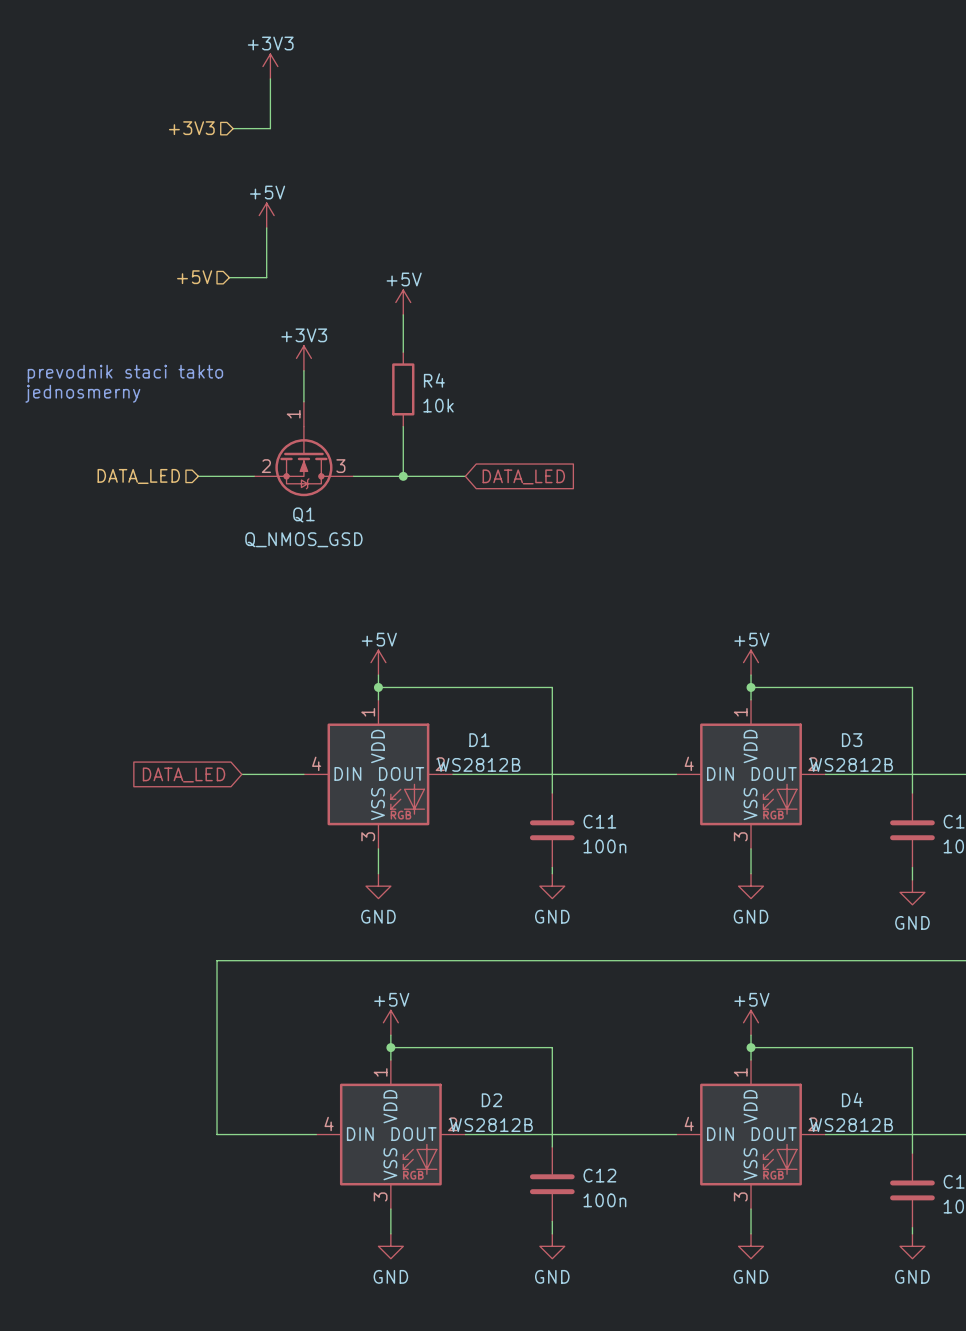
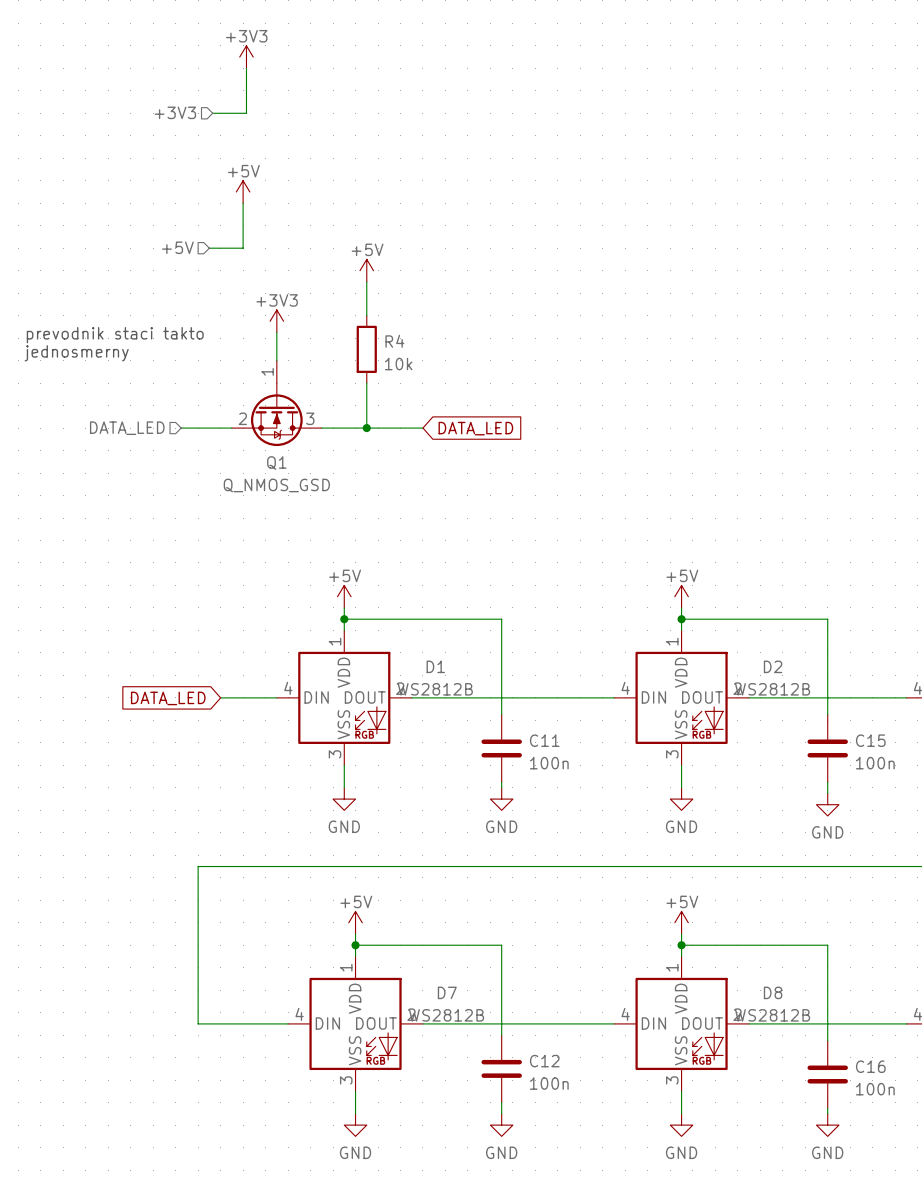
D3 name: D3 (852, 740) -> D2 (773, 666)
D4 name: D4 (852, 1099) -> D8 (773, 992)
D2 name: D2 (491, 1100) -> D7 (447, 992)

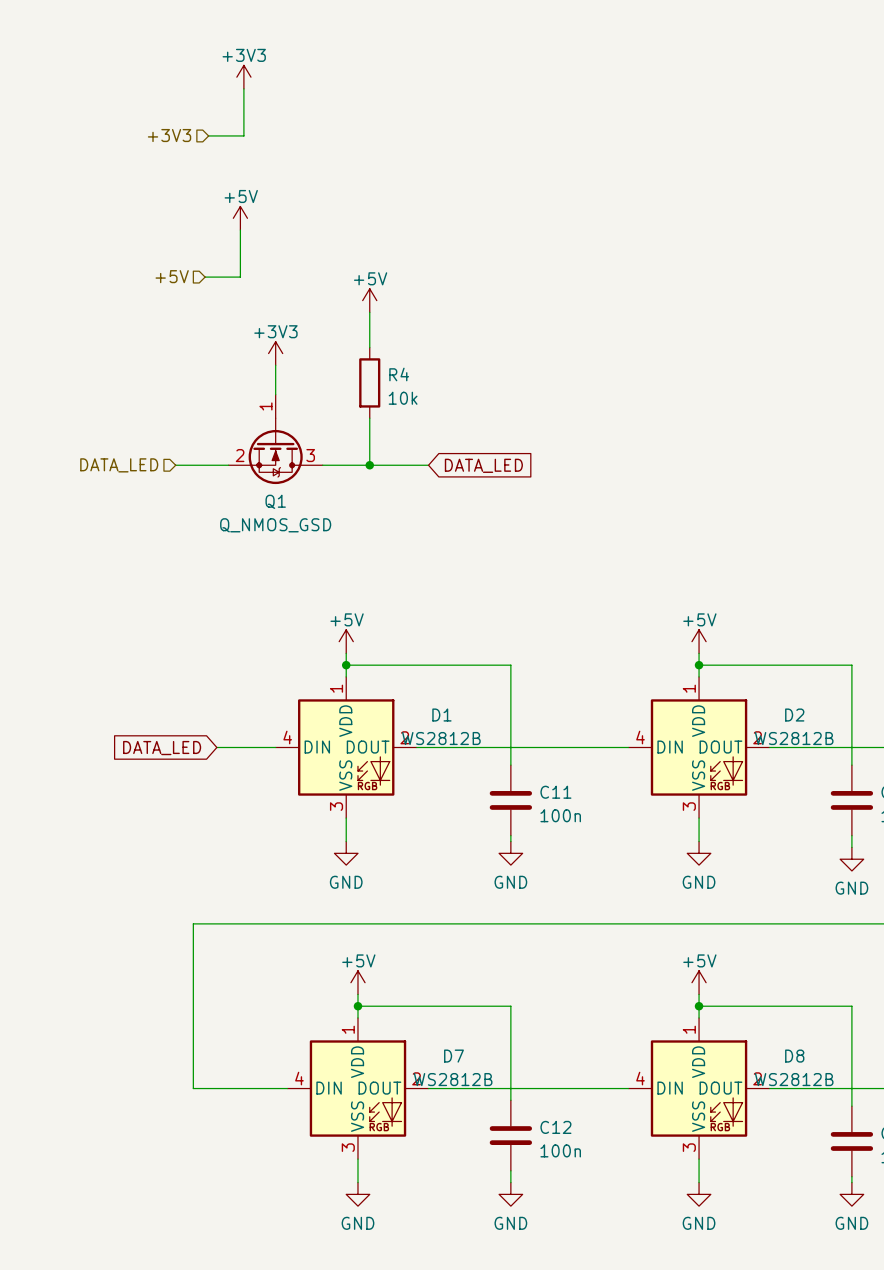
text: prevodnik staci takto (115, 335) -> none
text: jednosmerny (76, 353) -> none

